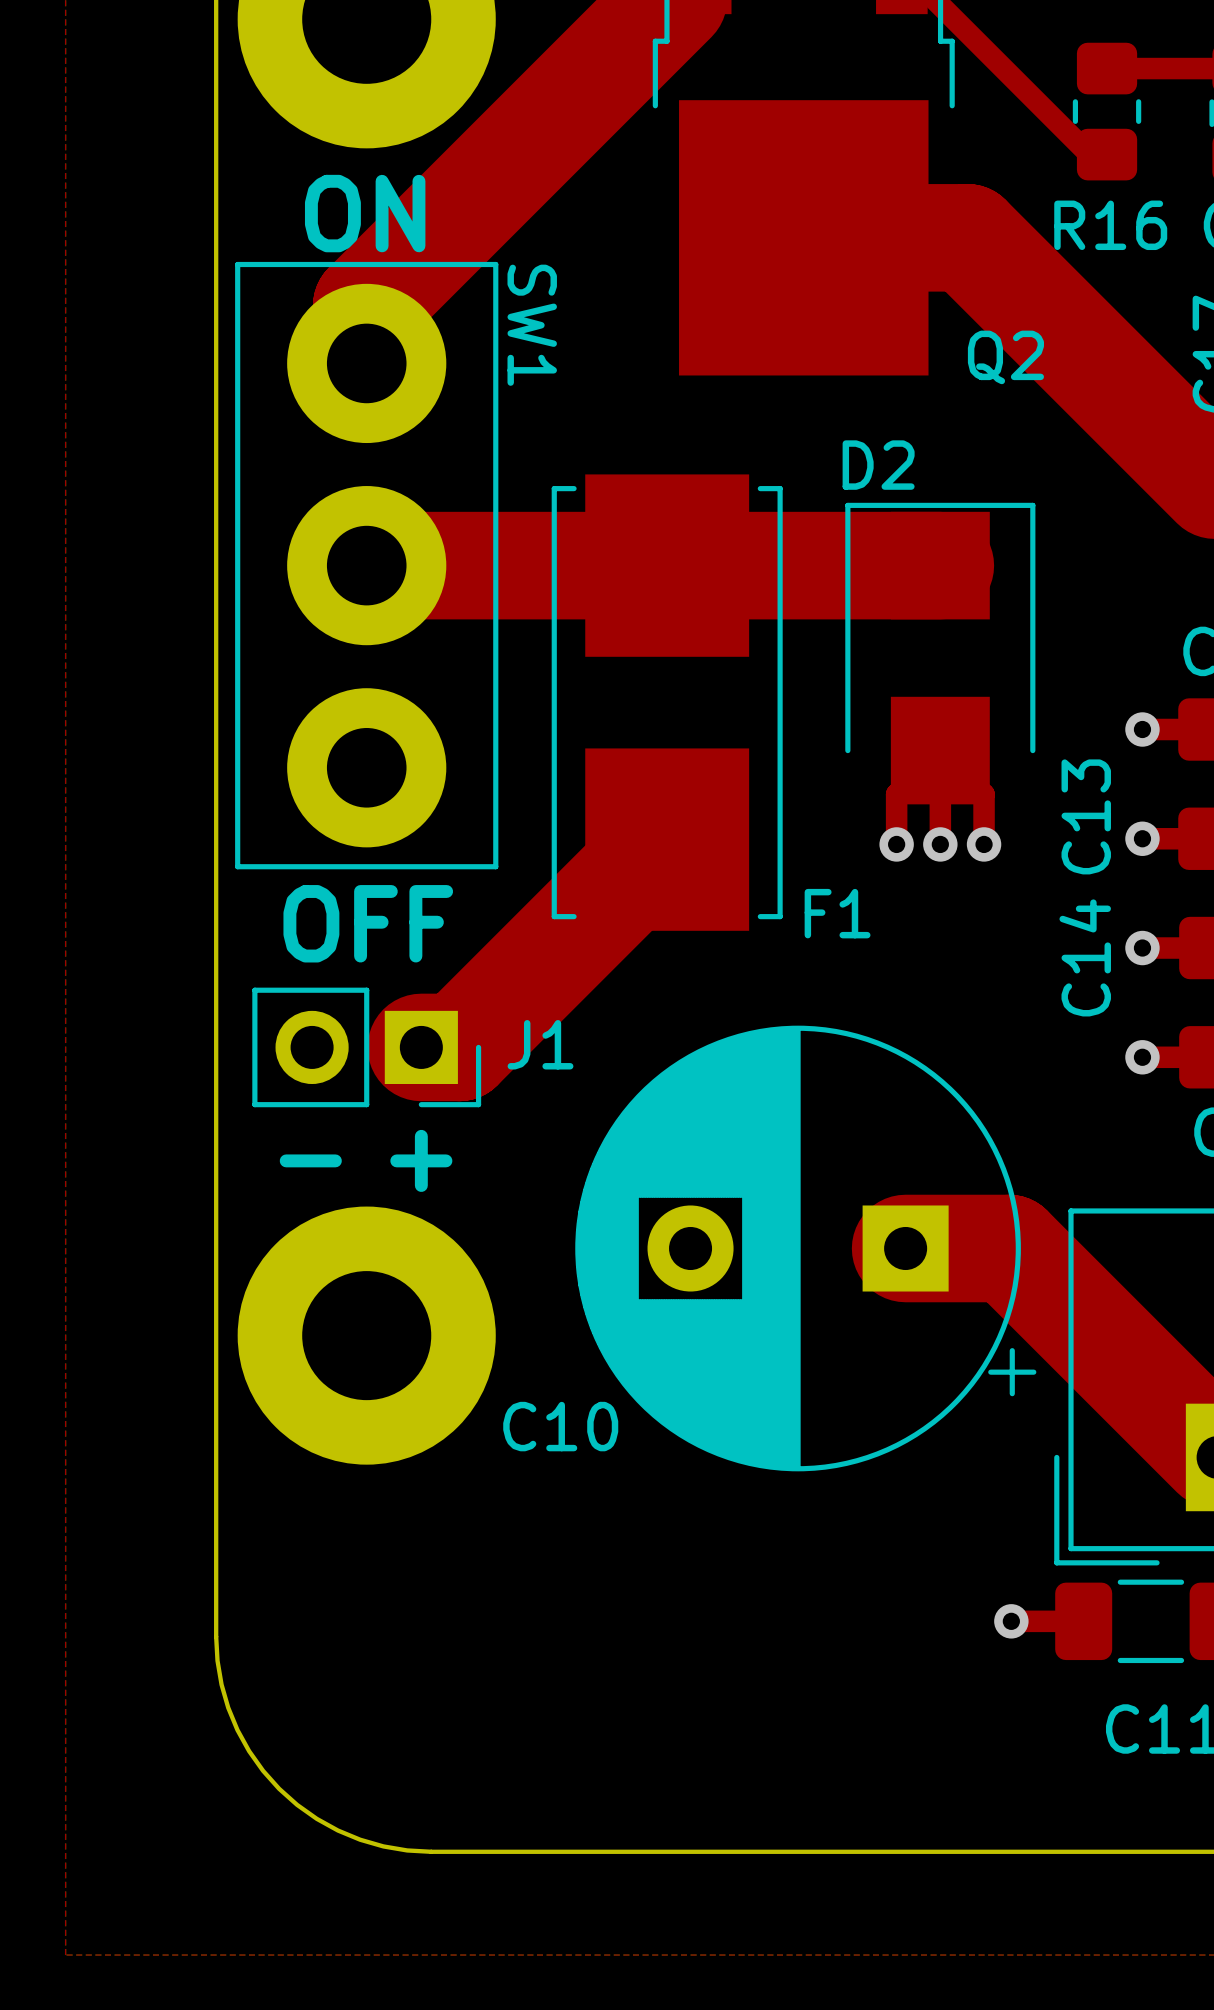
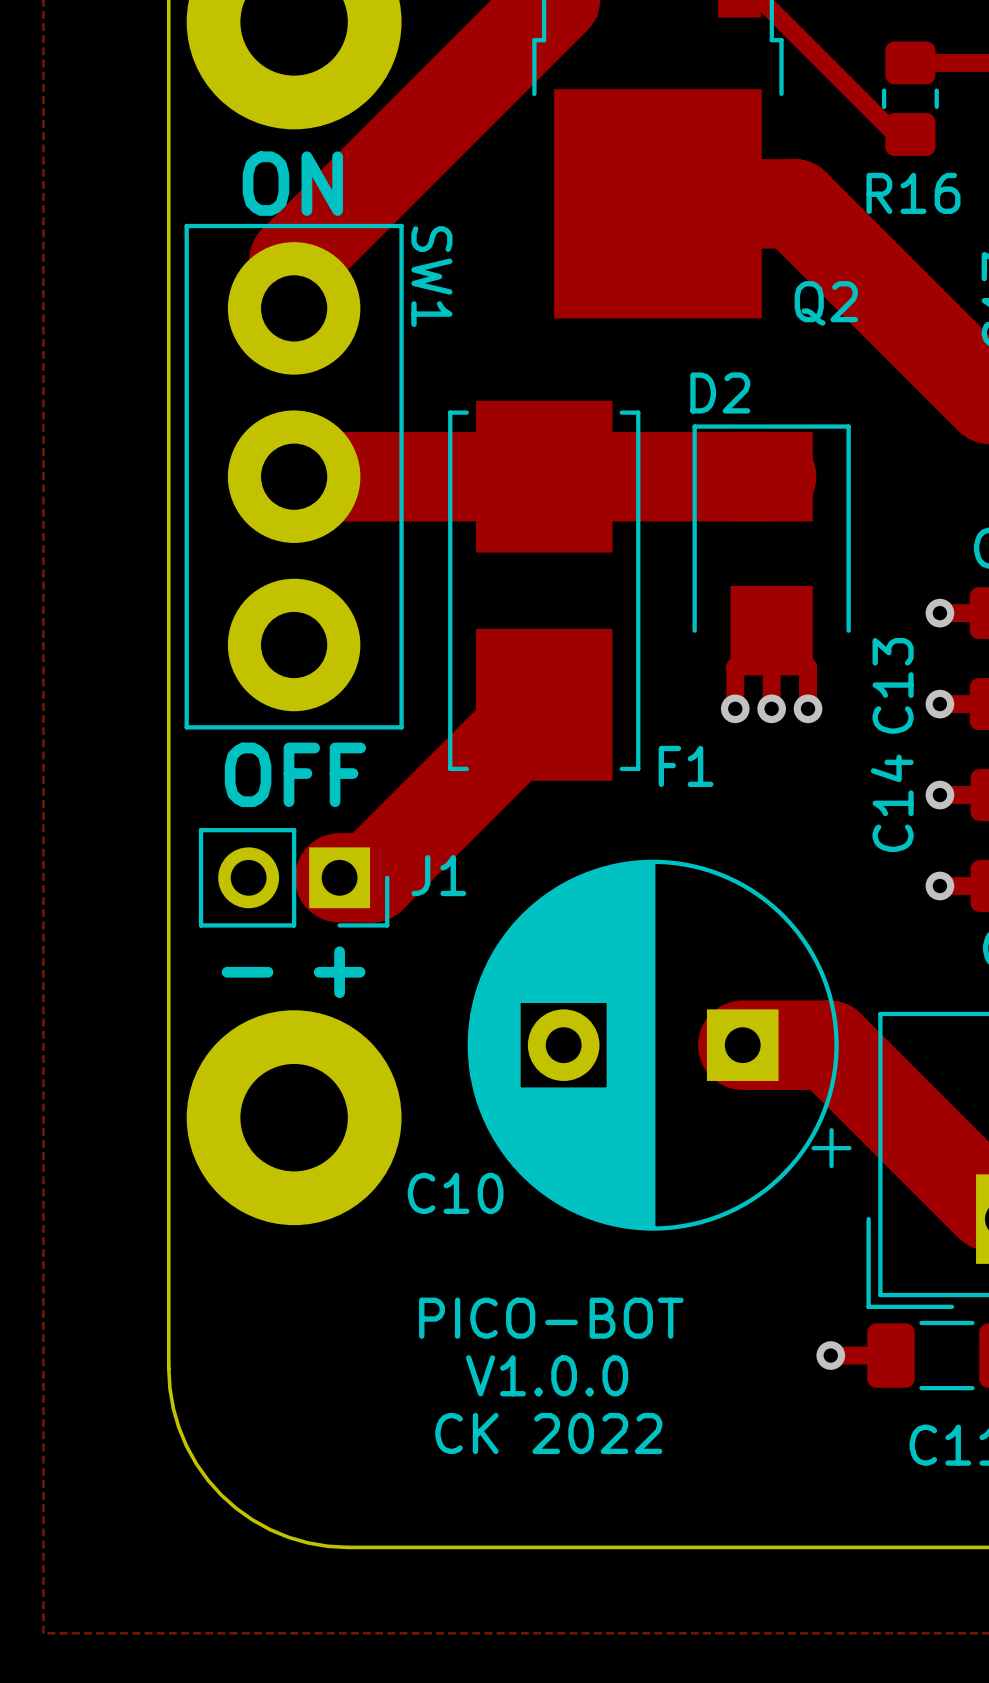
text: none -> PICO-BOT (551, 1318)
text: none -> V1.0.0 (547, 1375)
text: none -> CK 2022 (548, 1433)

